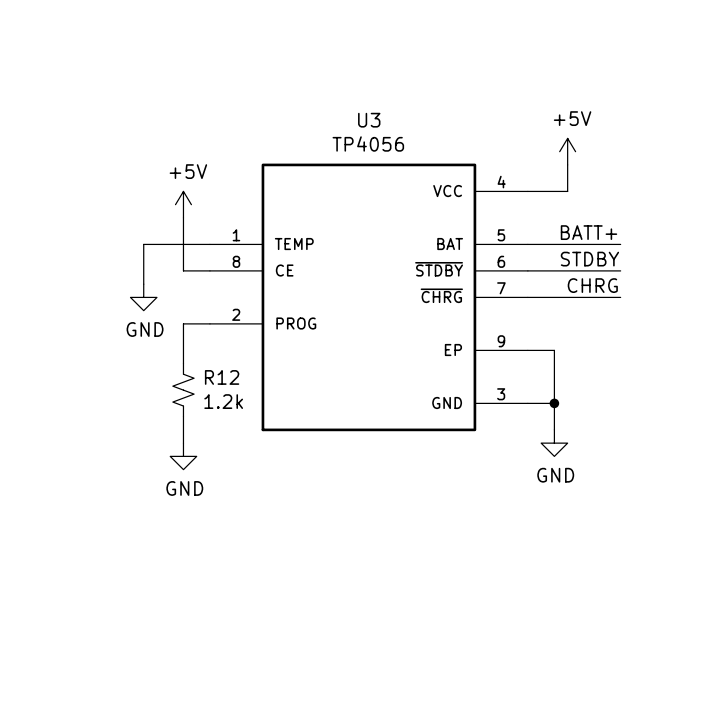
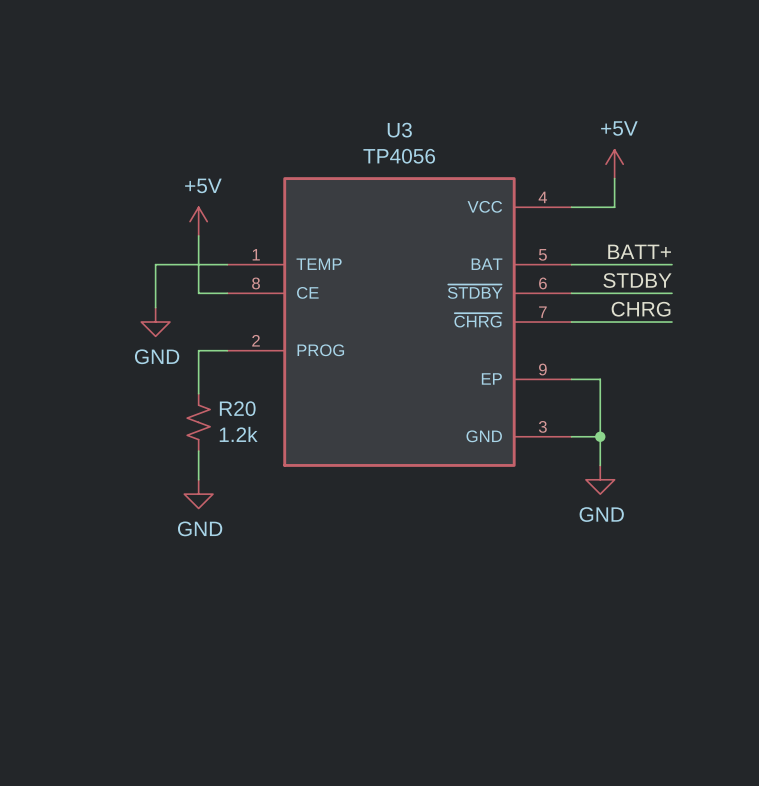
R12 name: R12 (222, 377) -> R20 (237, 408)

